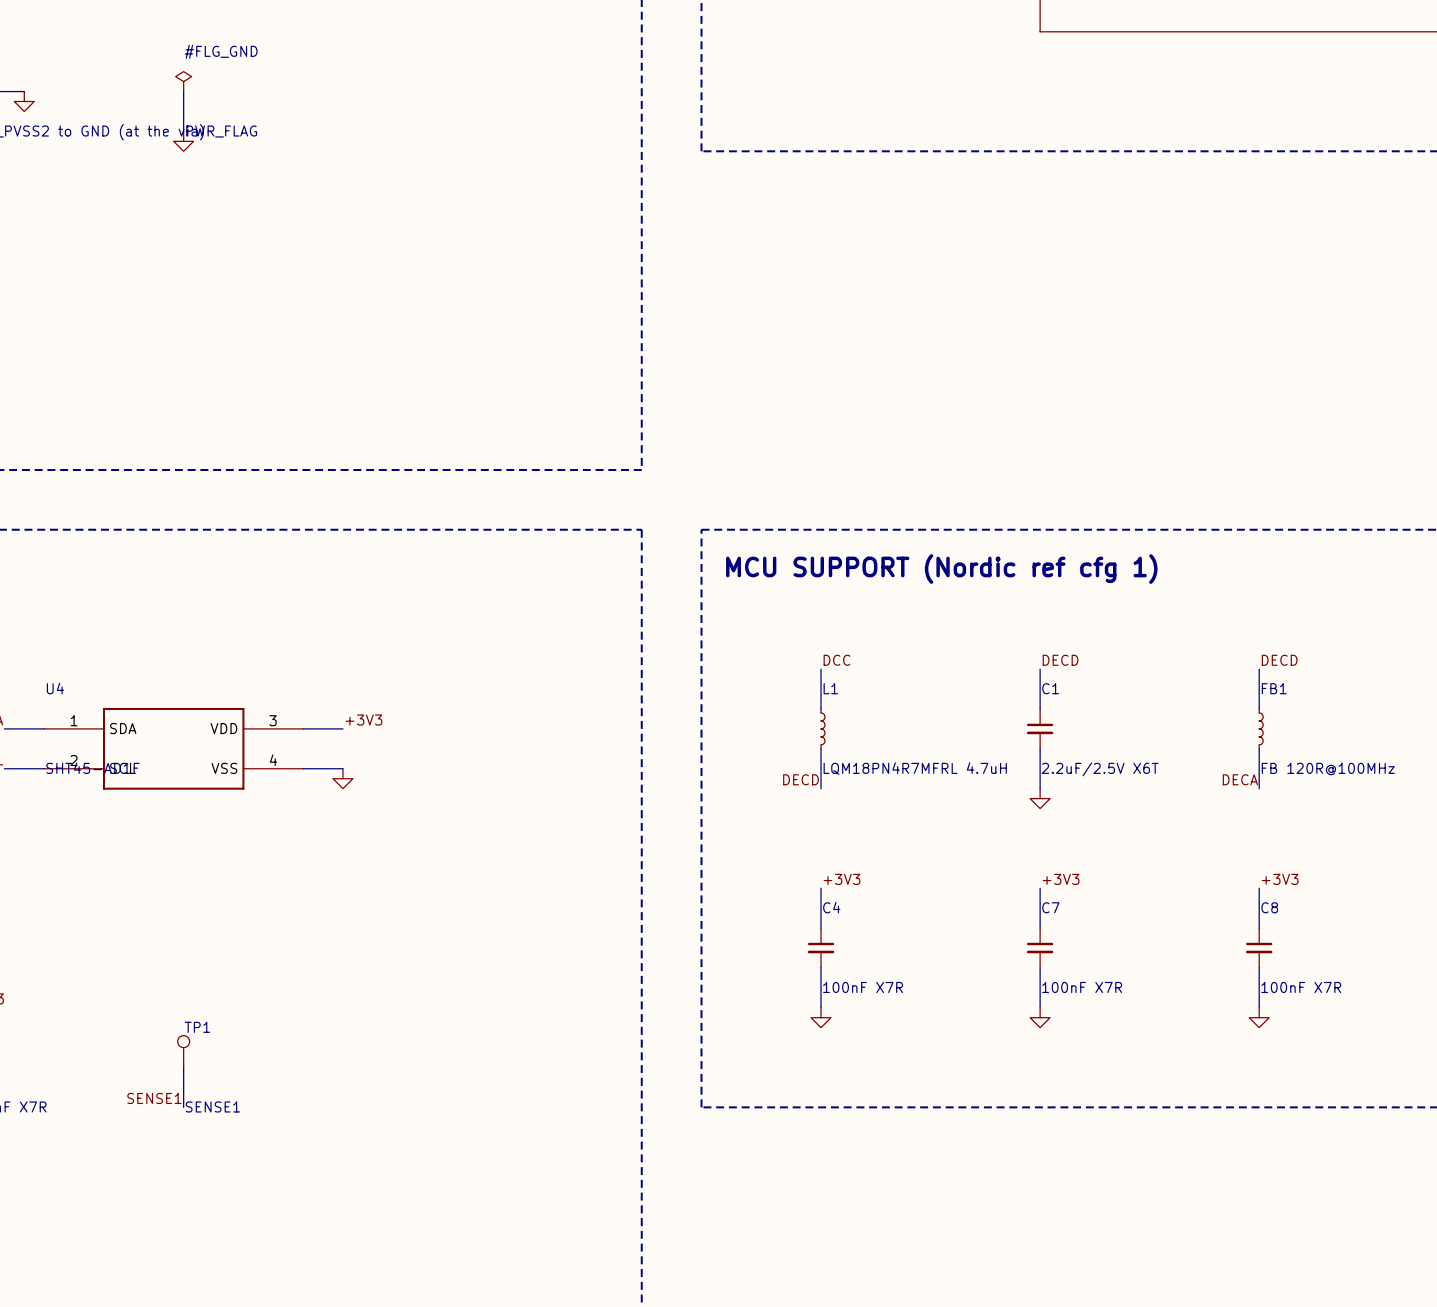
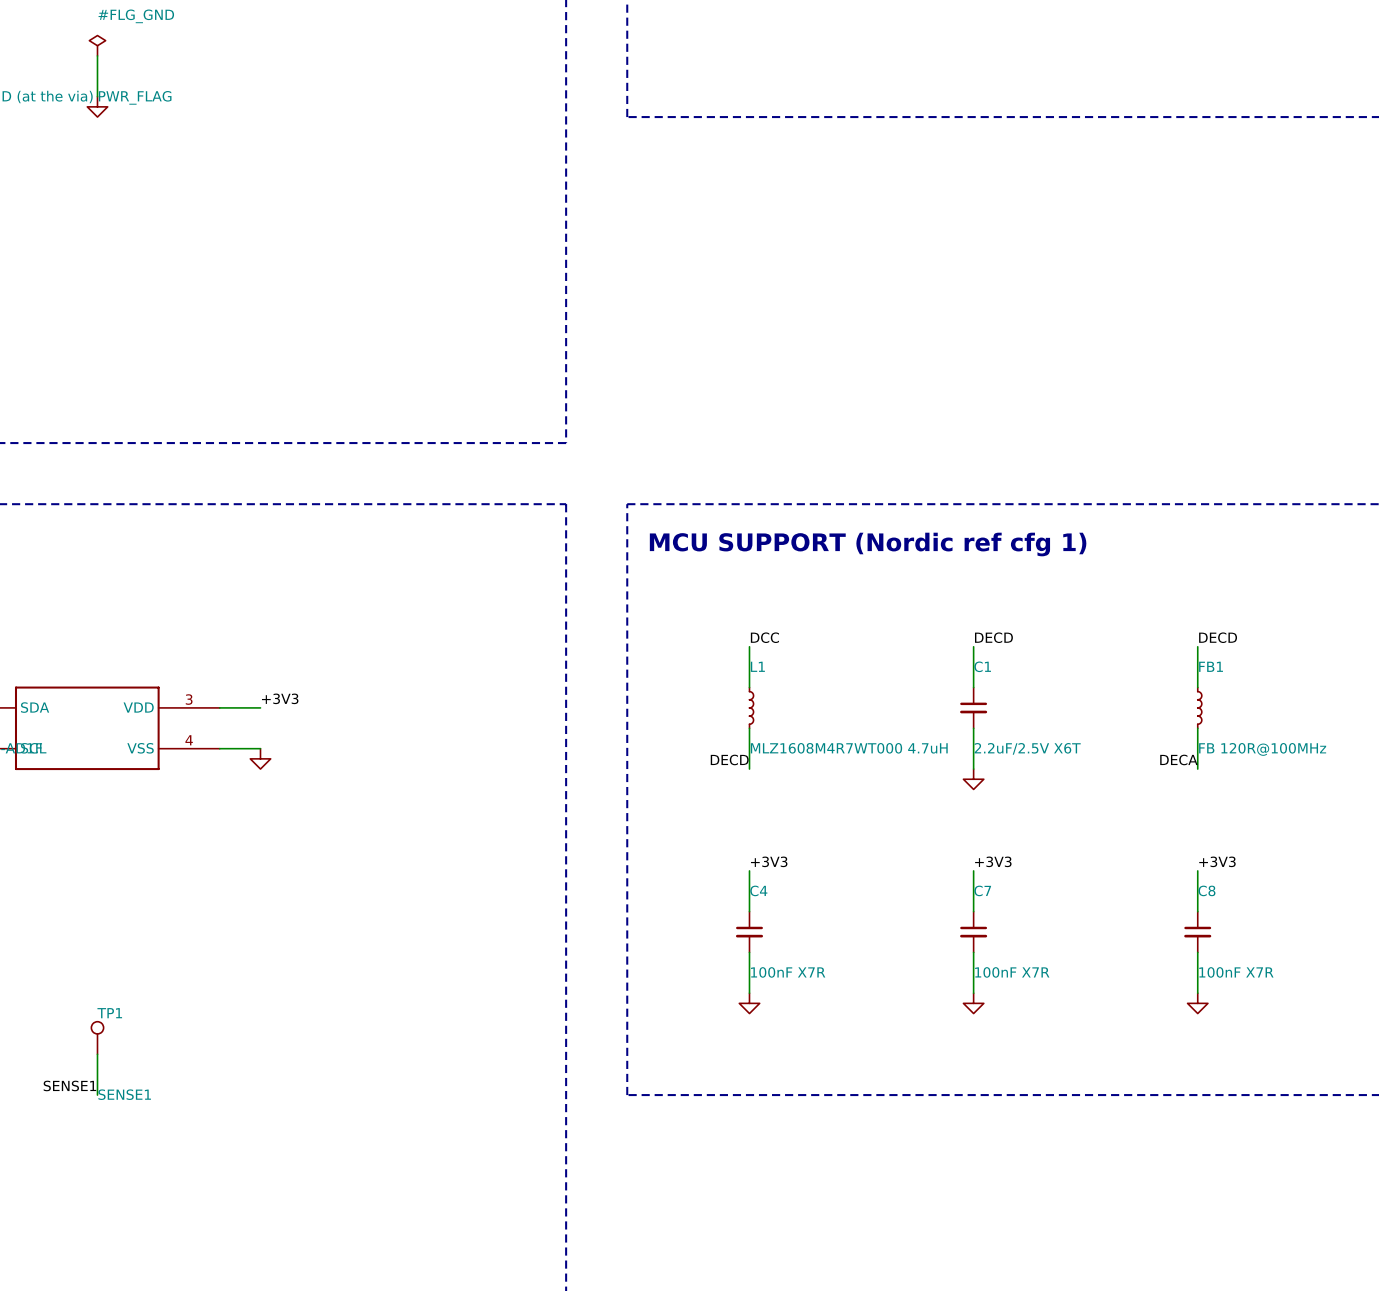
L1 value: LQM18PN4R7MFRL 4.7uH (915, 768) -> MLZ1608M4R7WT000 4.7uH (849, 748)

